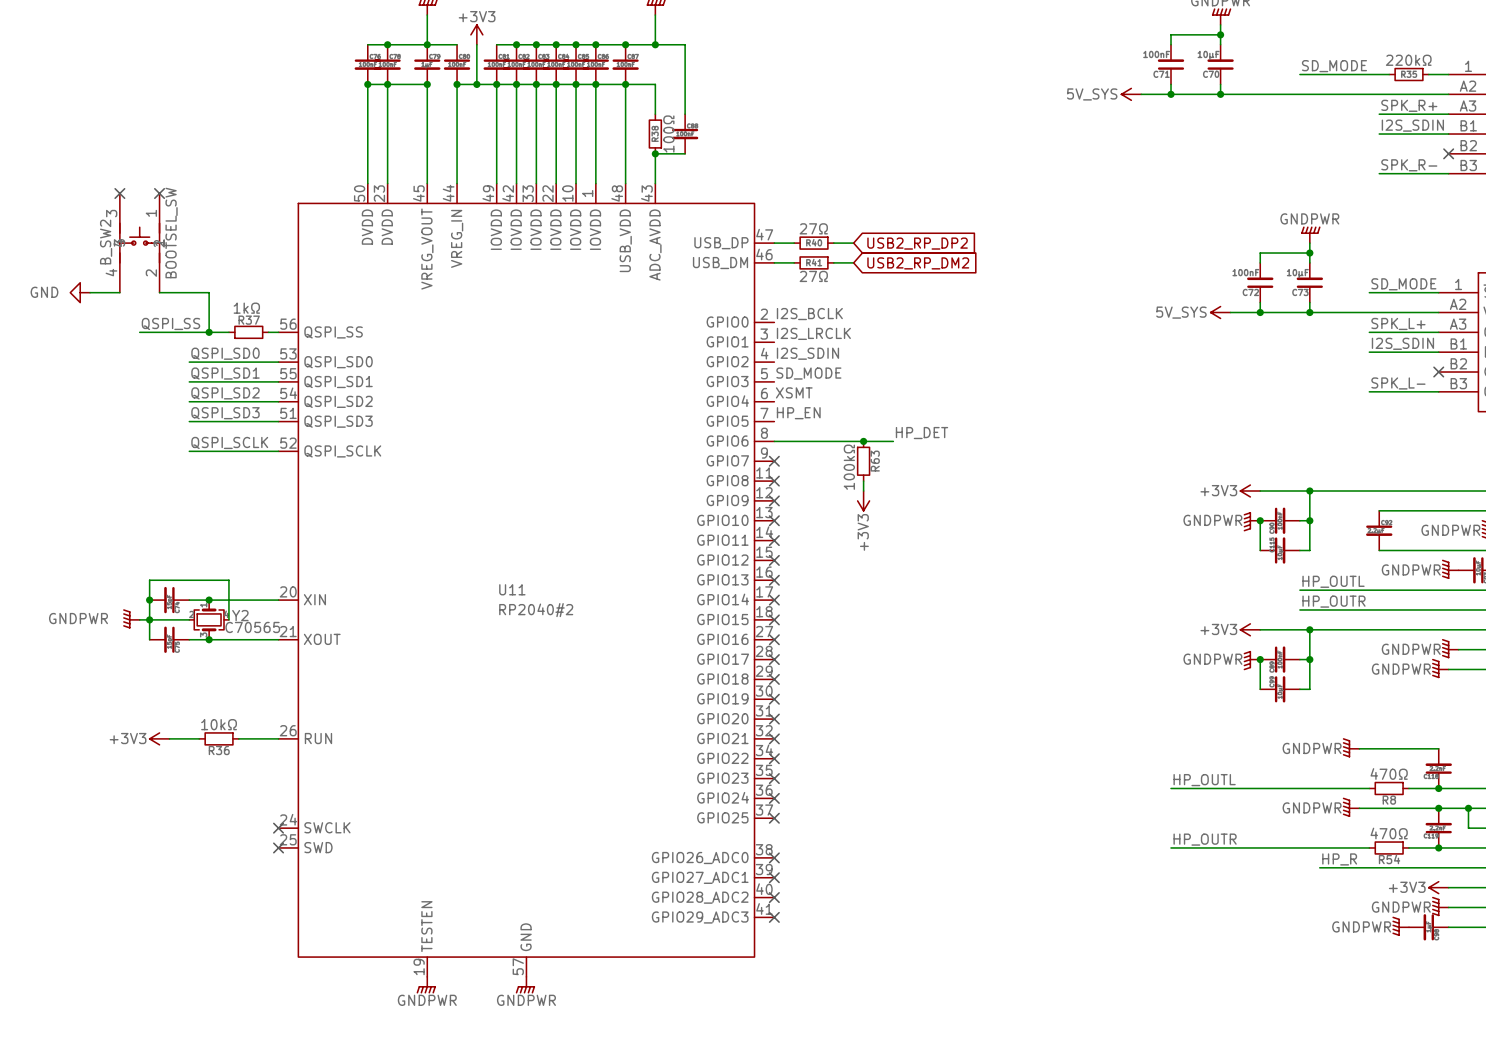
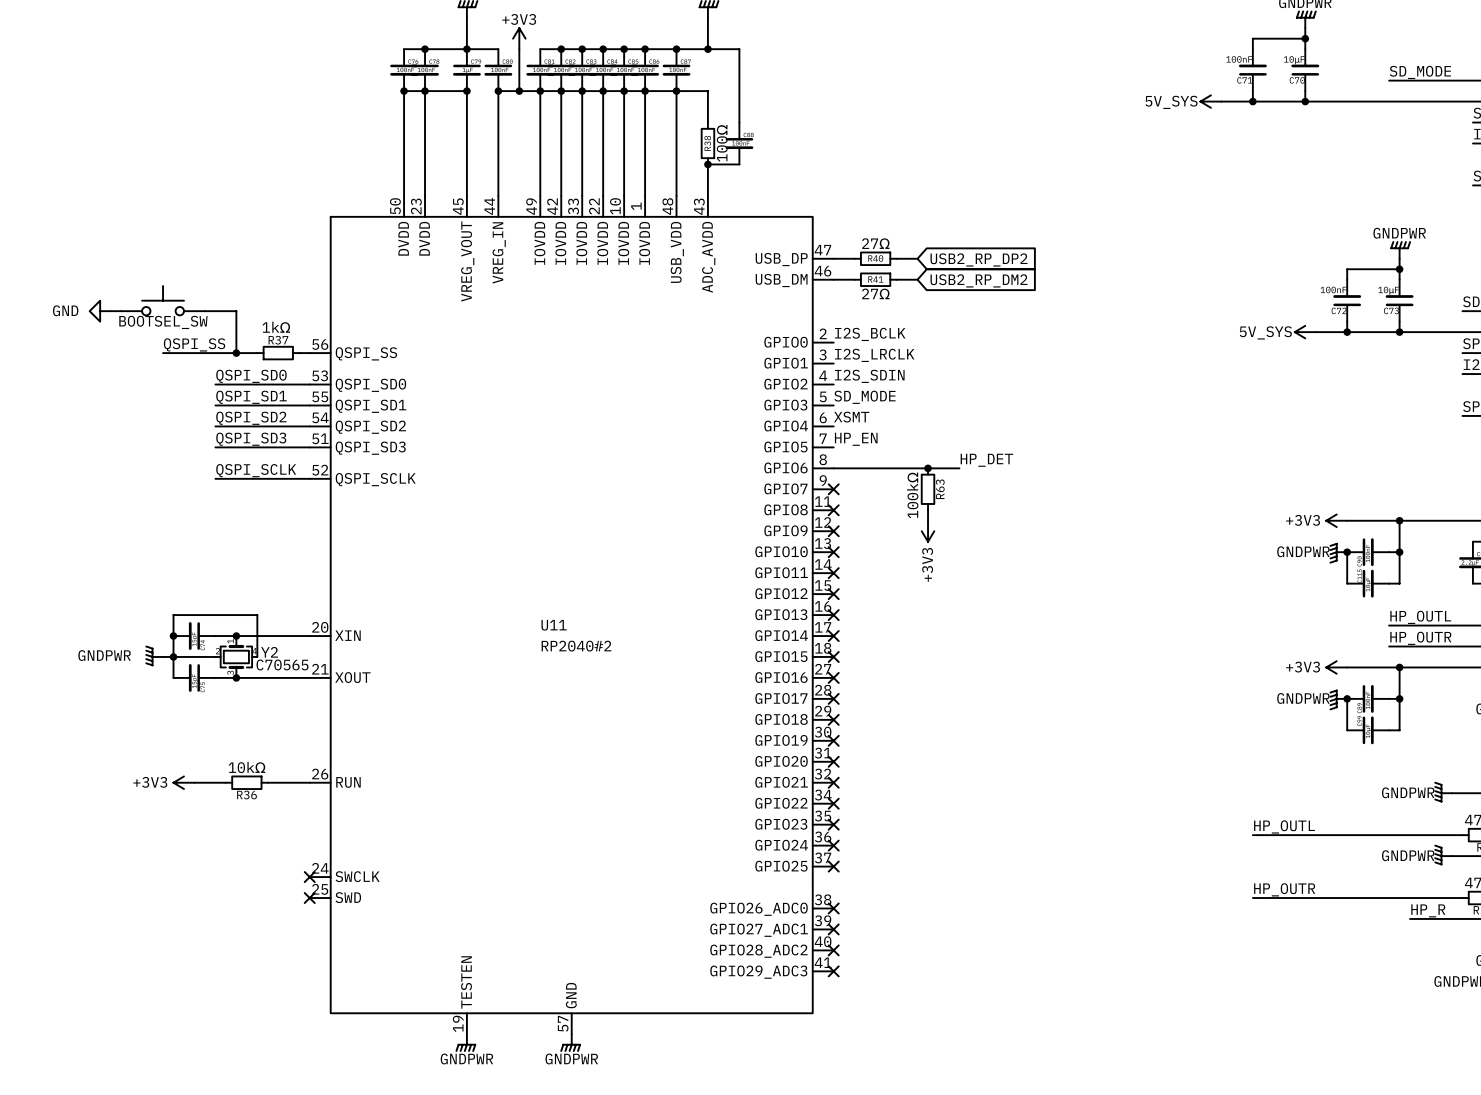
no-connect mark: (119, 193) -> none
no-connect mark: (159, 193) -> none
B_SW2: BOOTSEL_SW (139, 243) -> none
part: none -> BOOTSEL_SW (163, 300)

